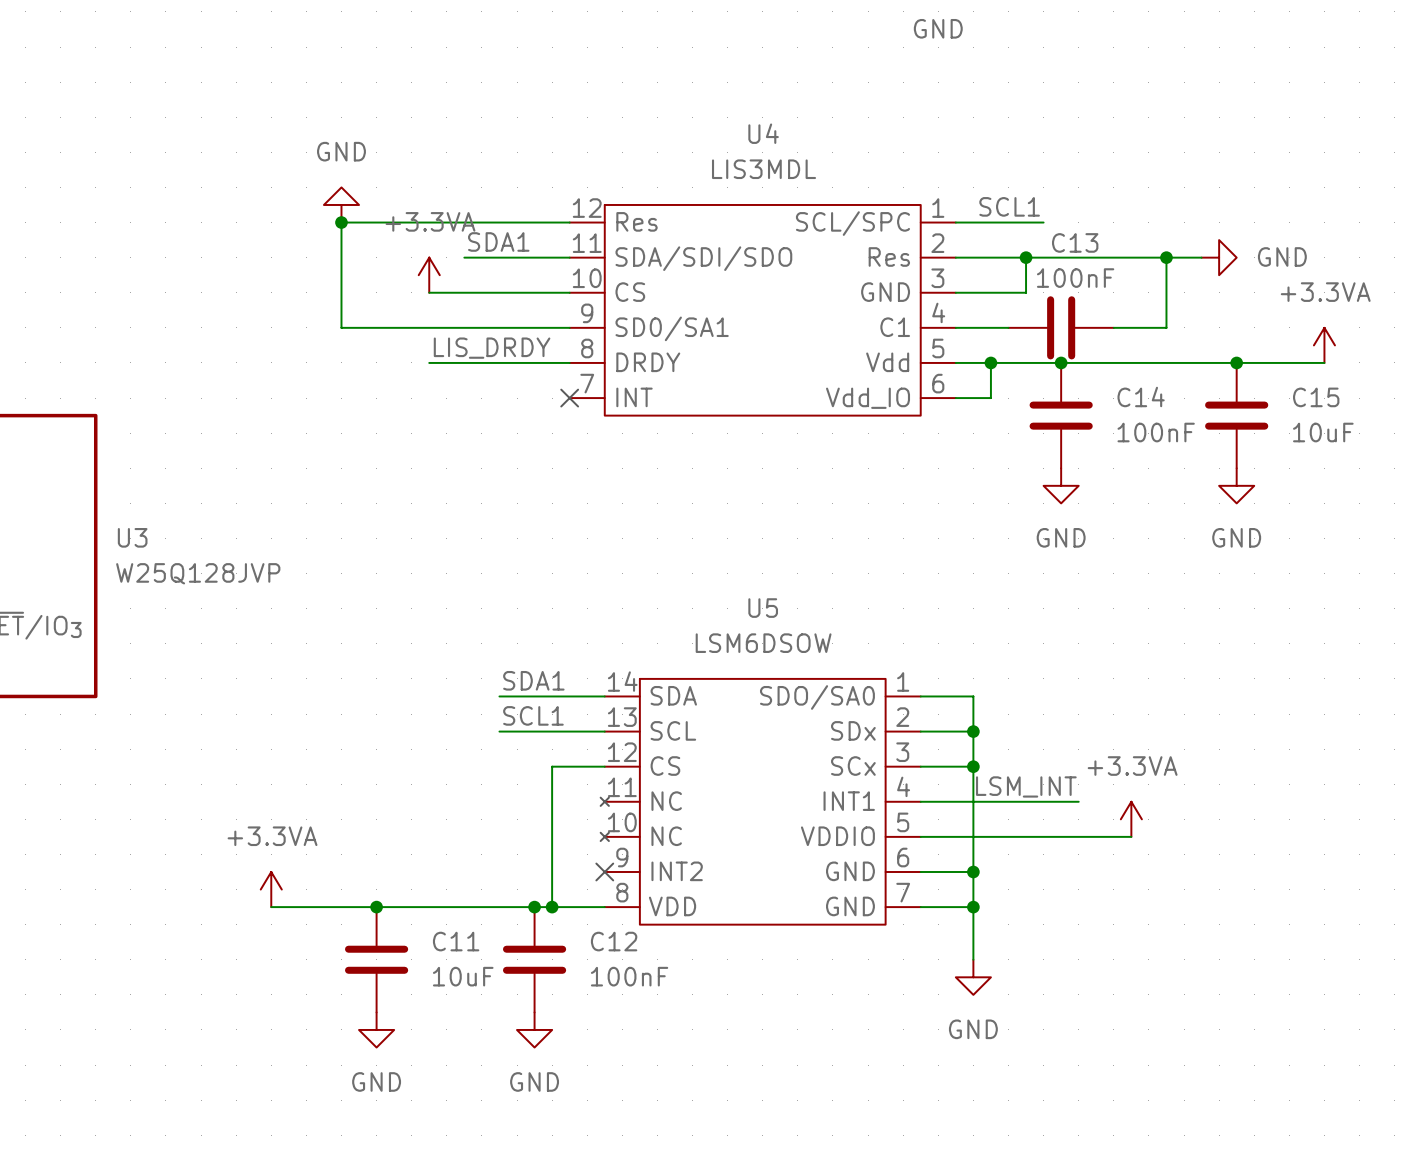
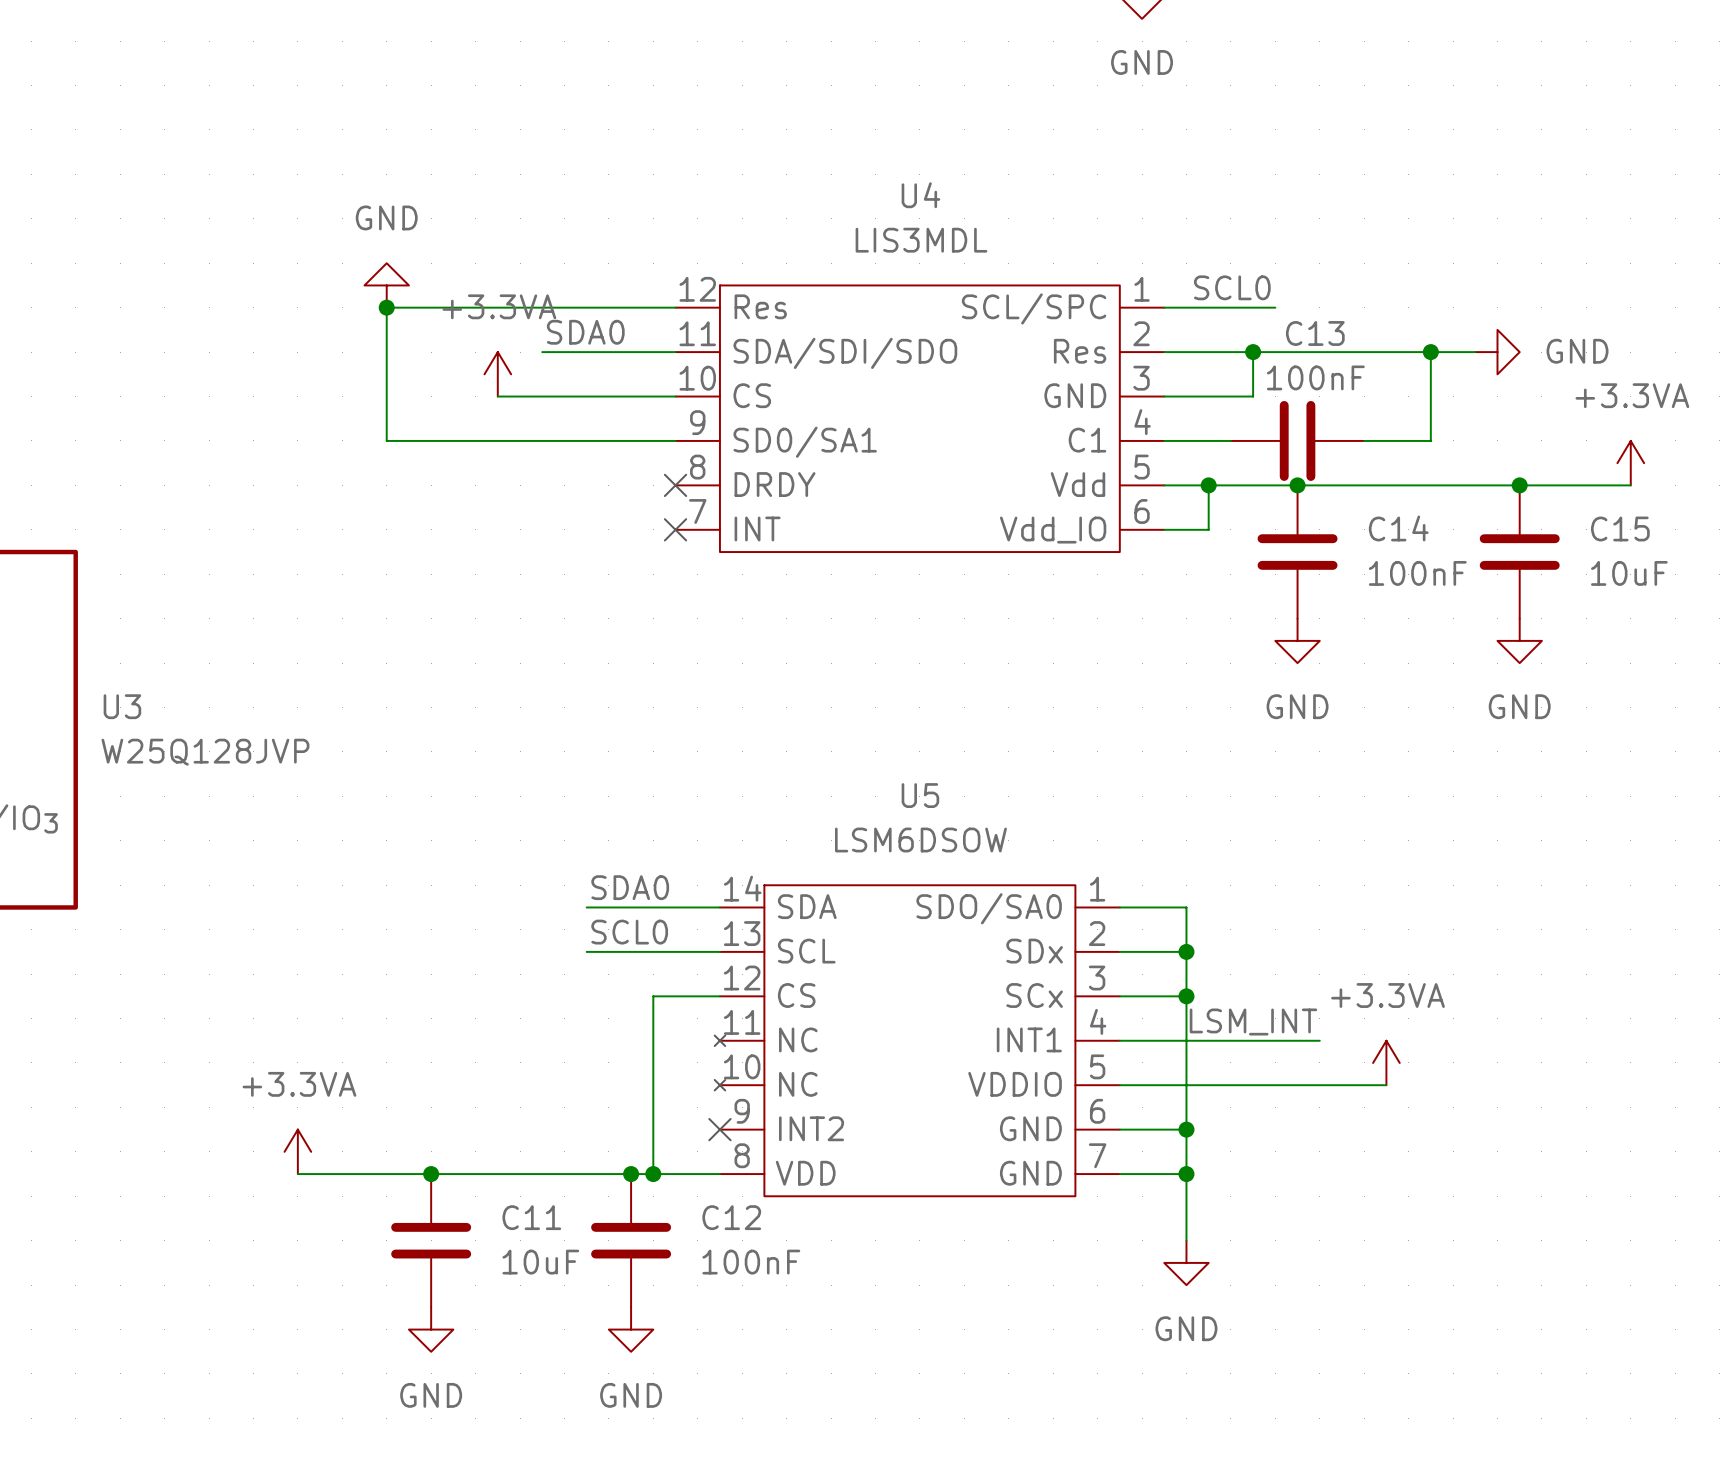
label: SCL1 (1009, 206) -> SCL0 (1232, 287)
label: SDA1 (498, 241) -> SDA0 (585, 332)
label: LIS_DRDY (492, 348) -> none
wire: (429, 362) (569, 362) -> none
no-connect mark: none -> (675, 485)
label: SDA1 (533, 680) -> SDA0 (630, 887)
label: SCL1 (533, 715) -> SCL0 (629, 932)

